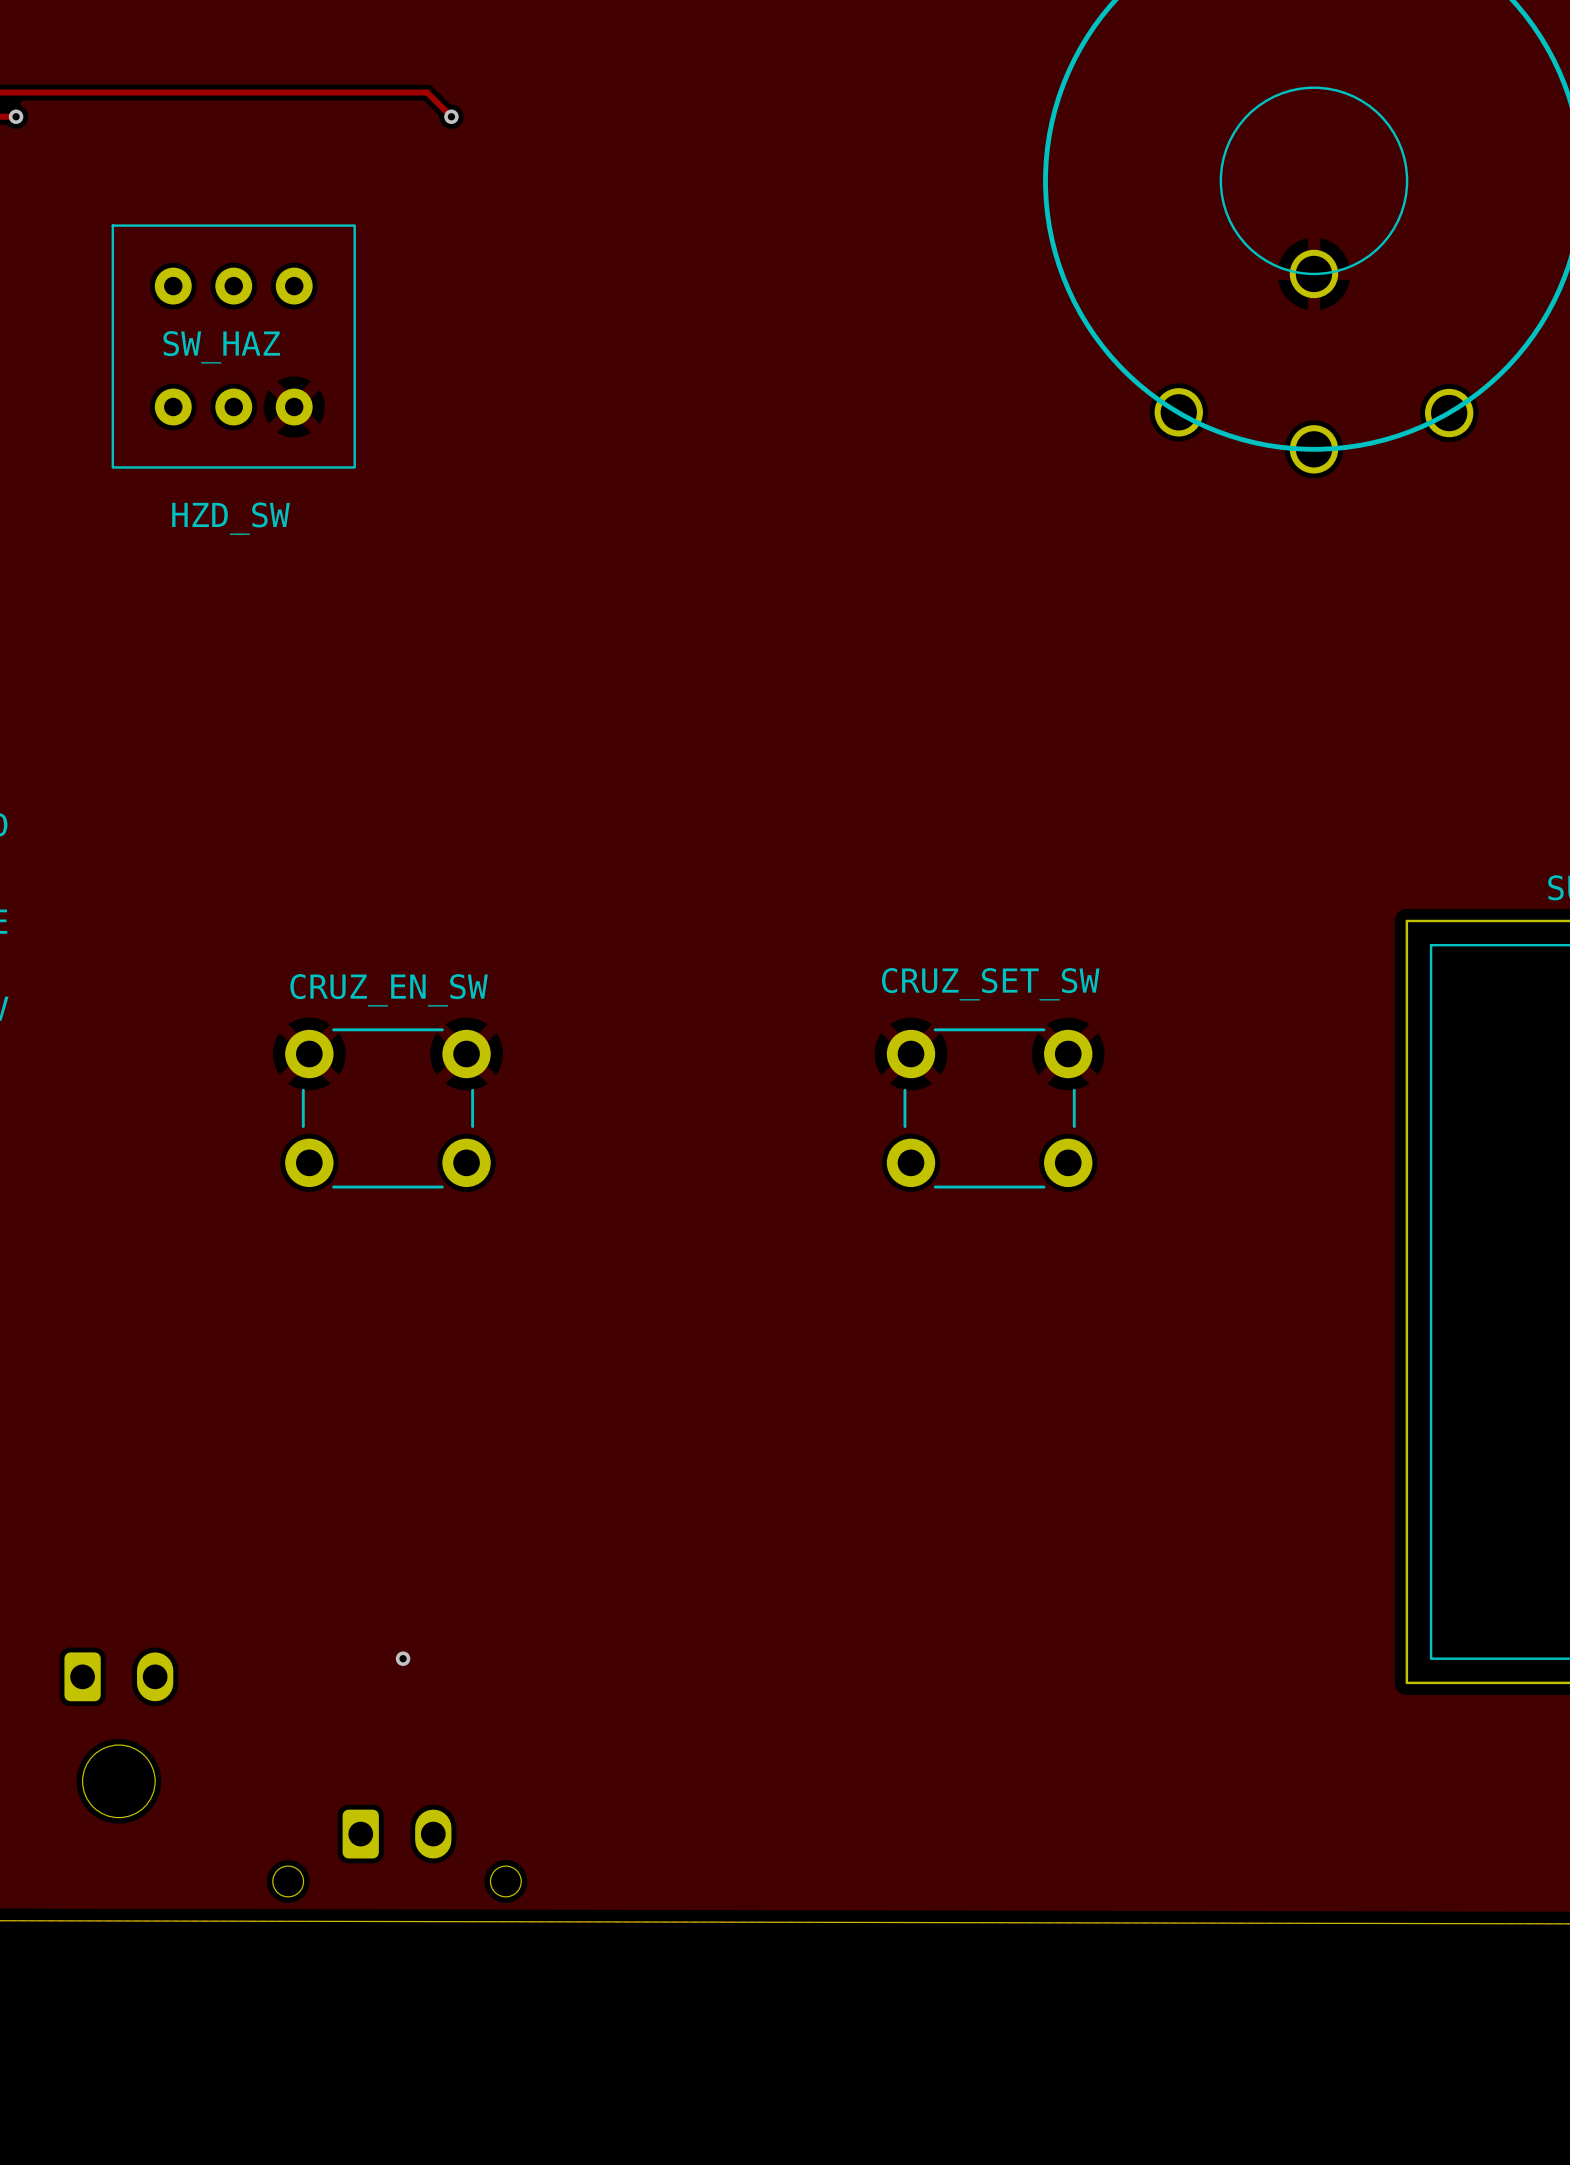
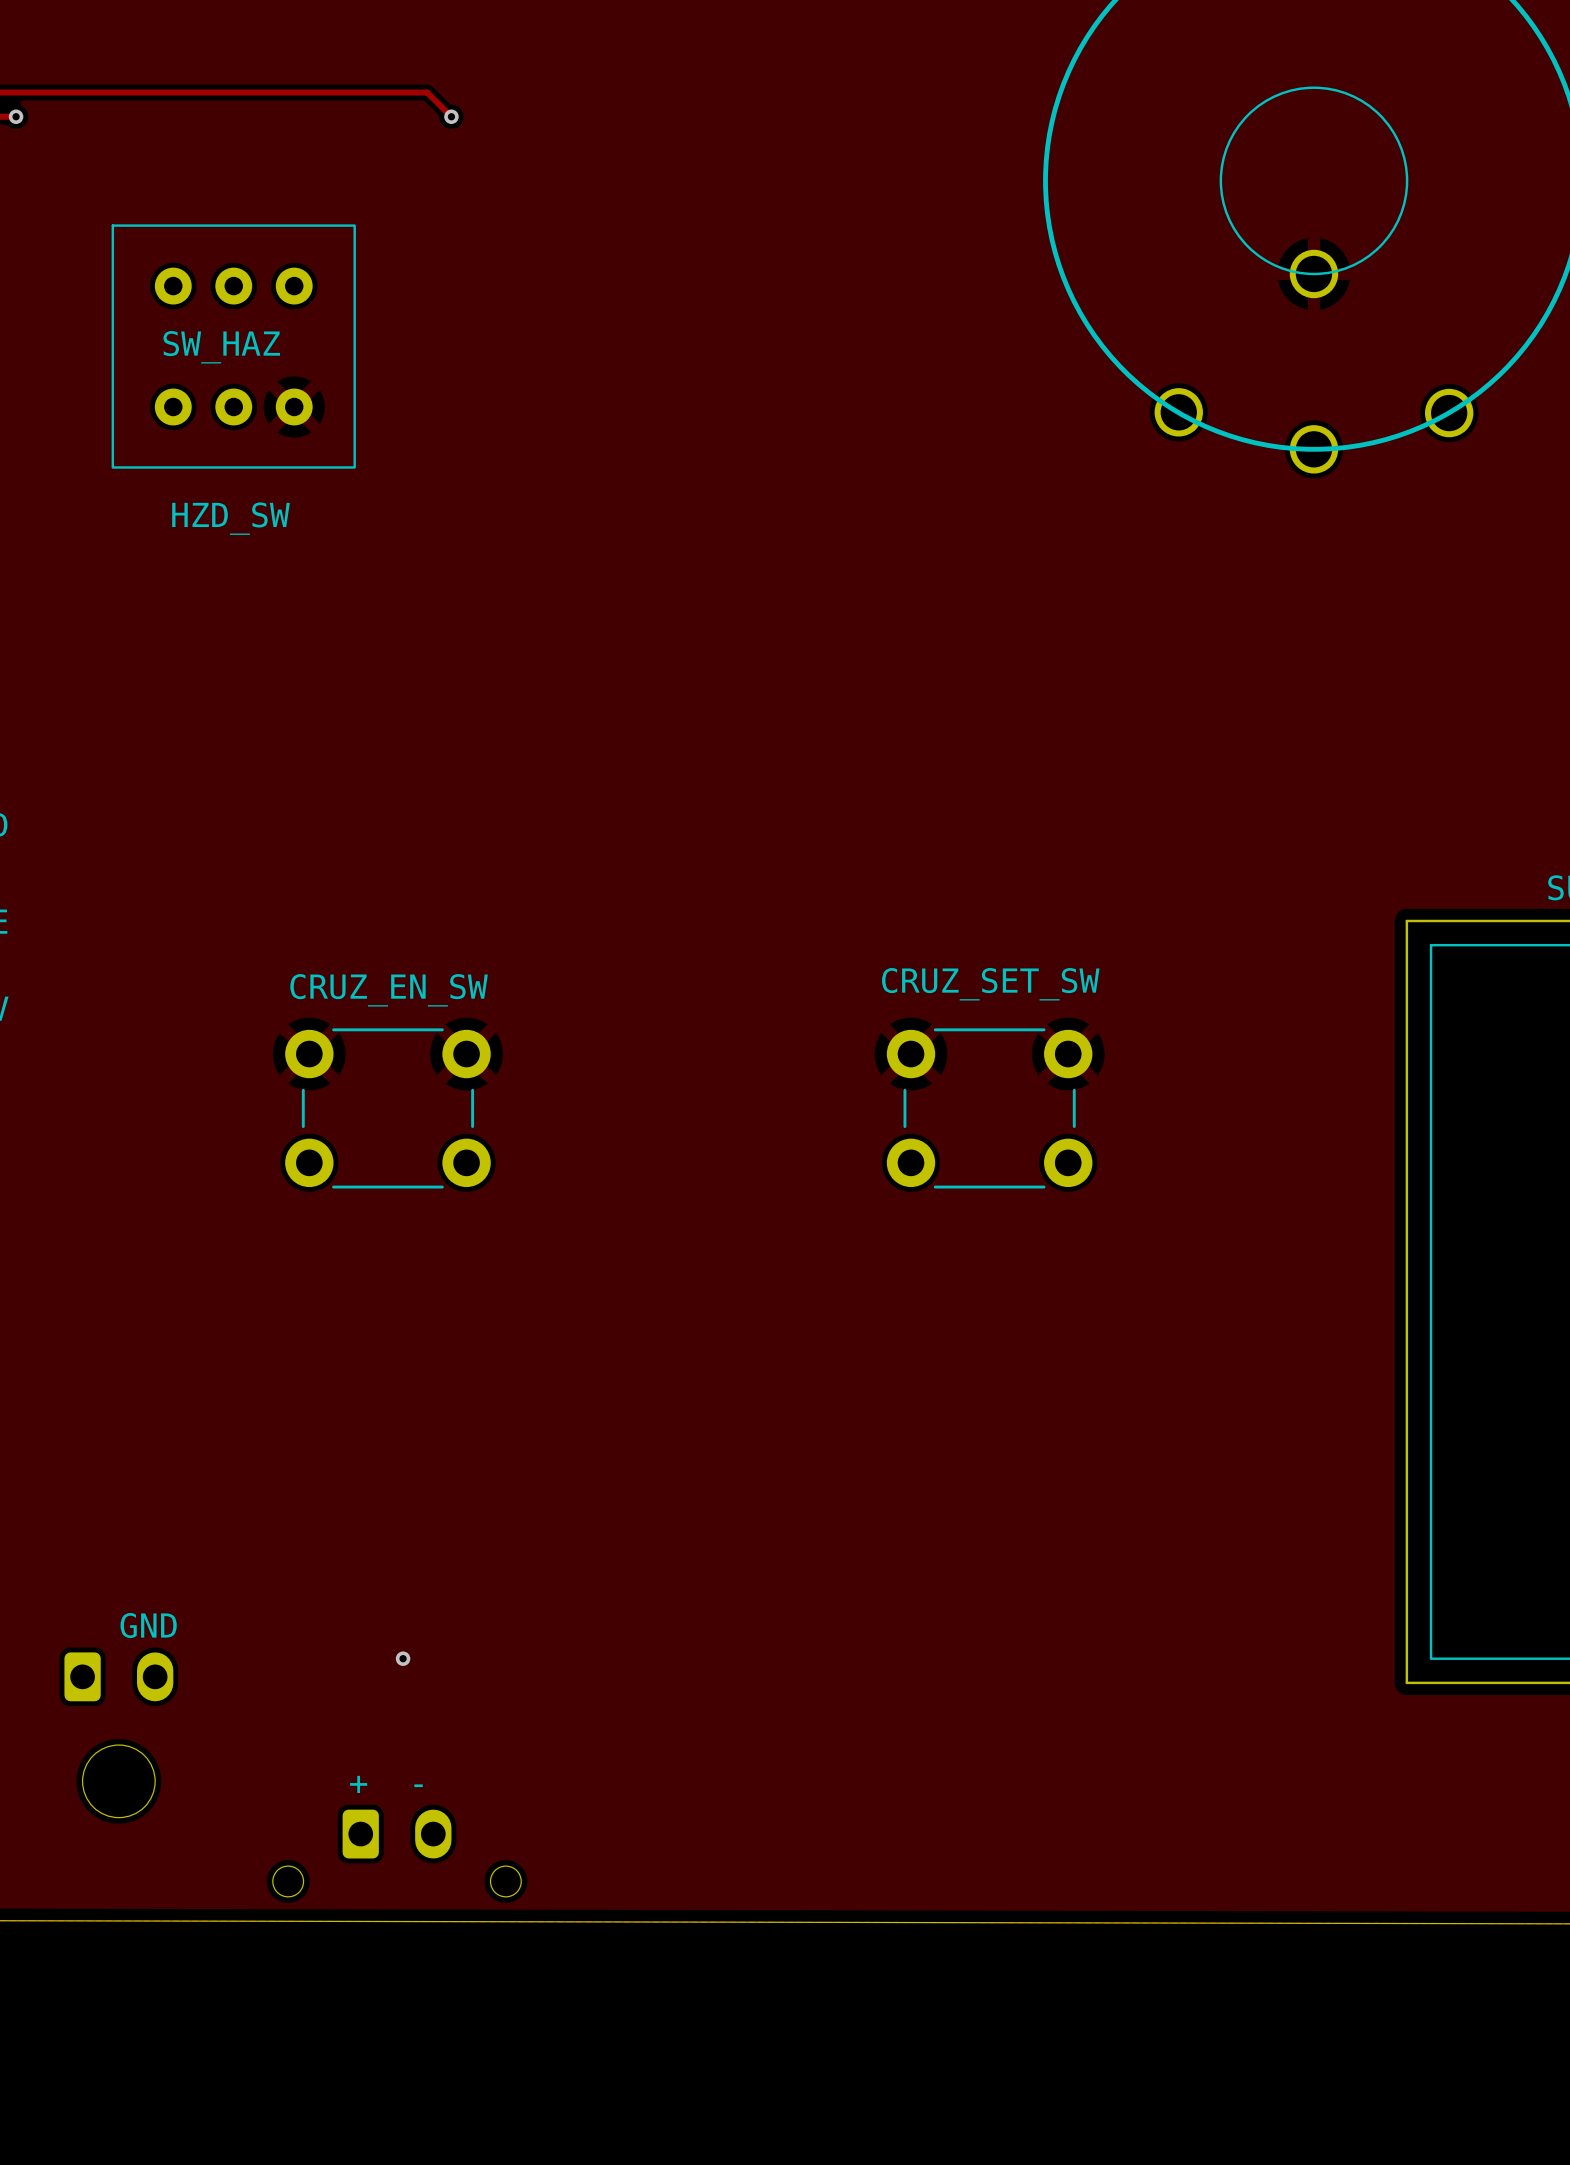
text: none -> GND (148, 1625)
text: none -> + - (386, 1784)

